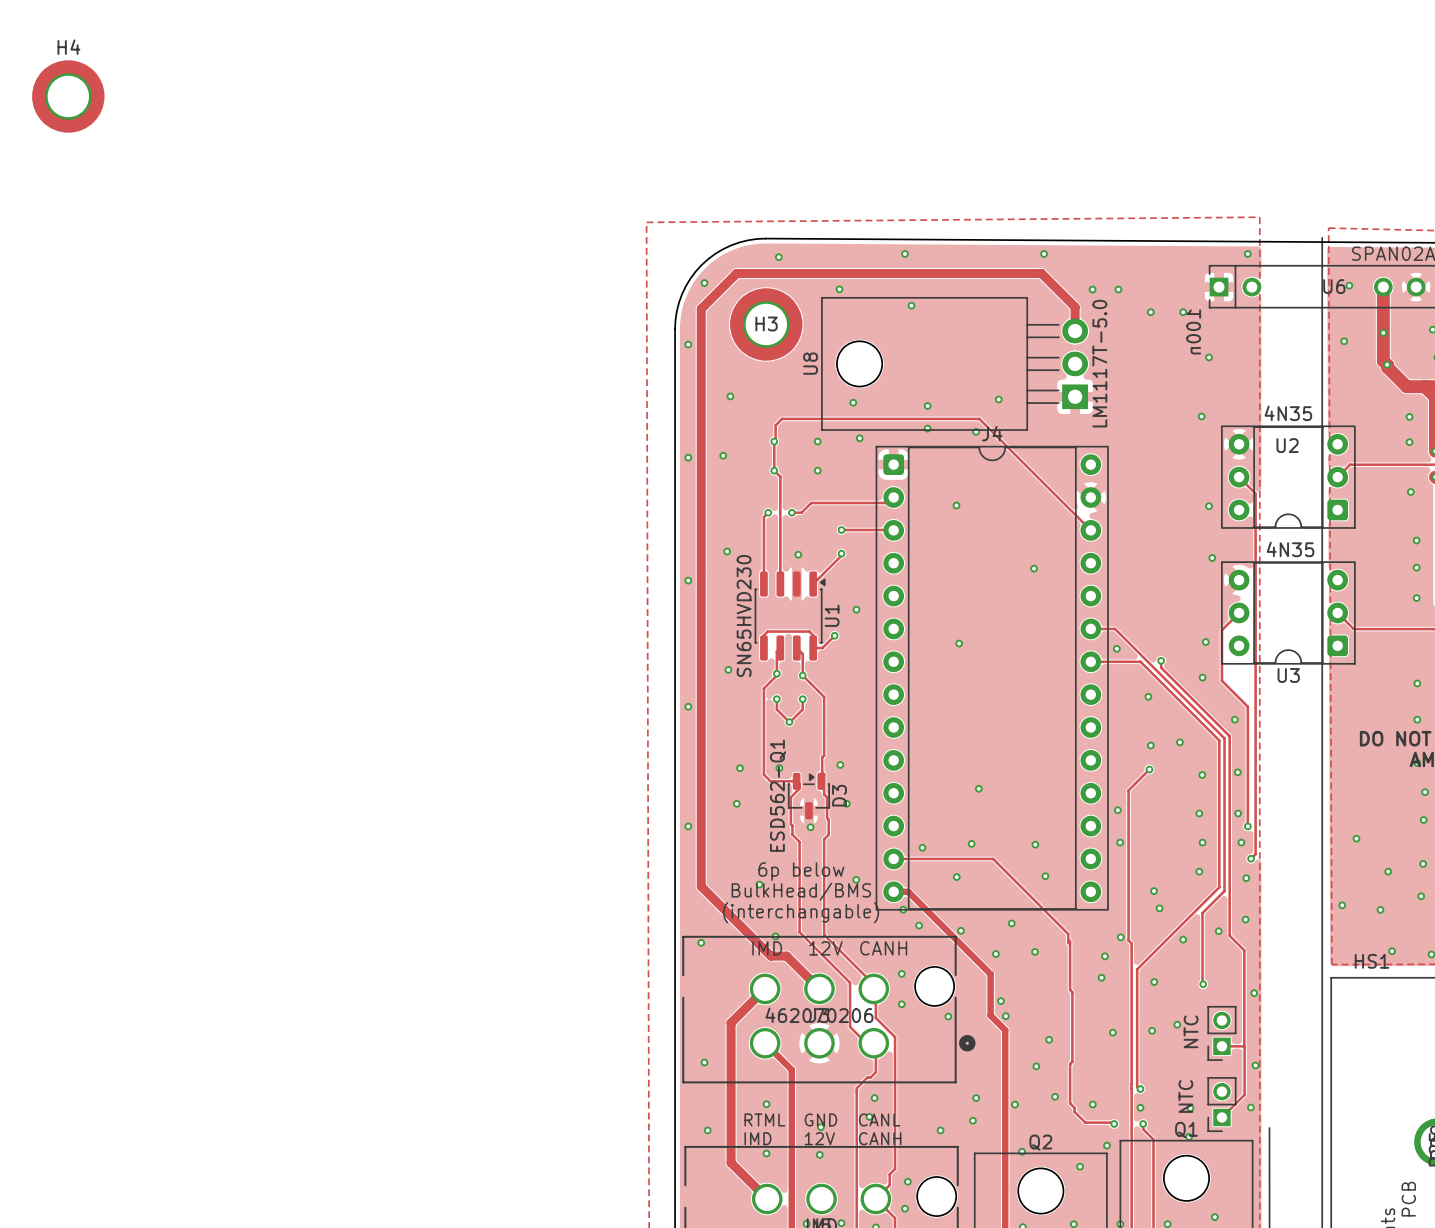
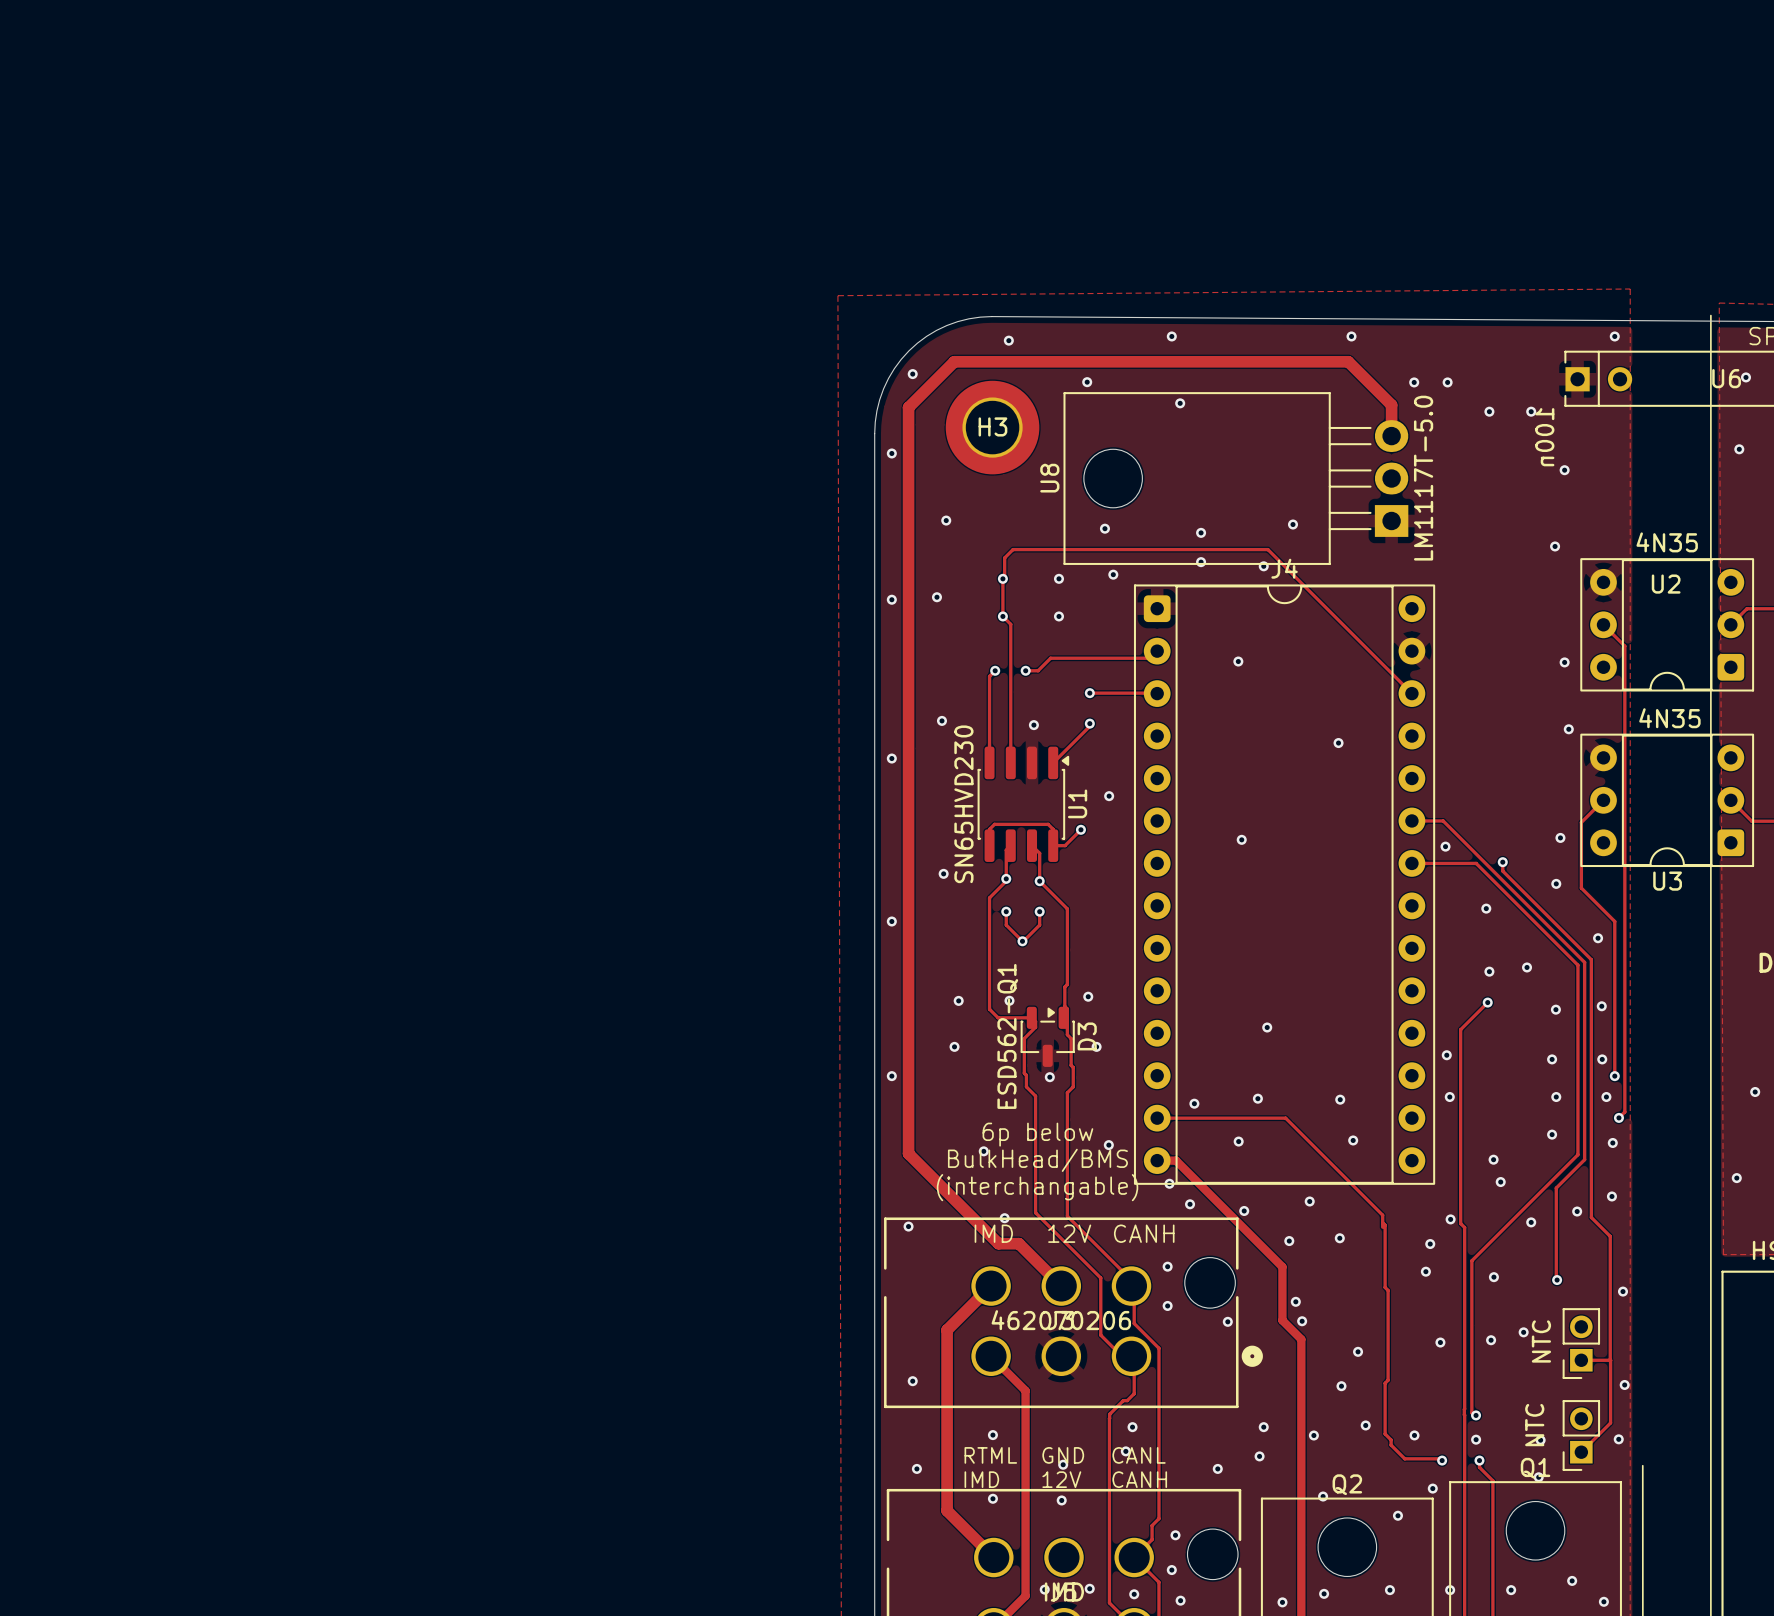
H4: (68, 96) -> none

